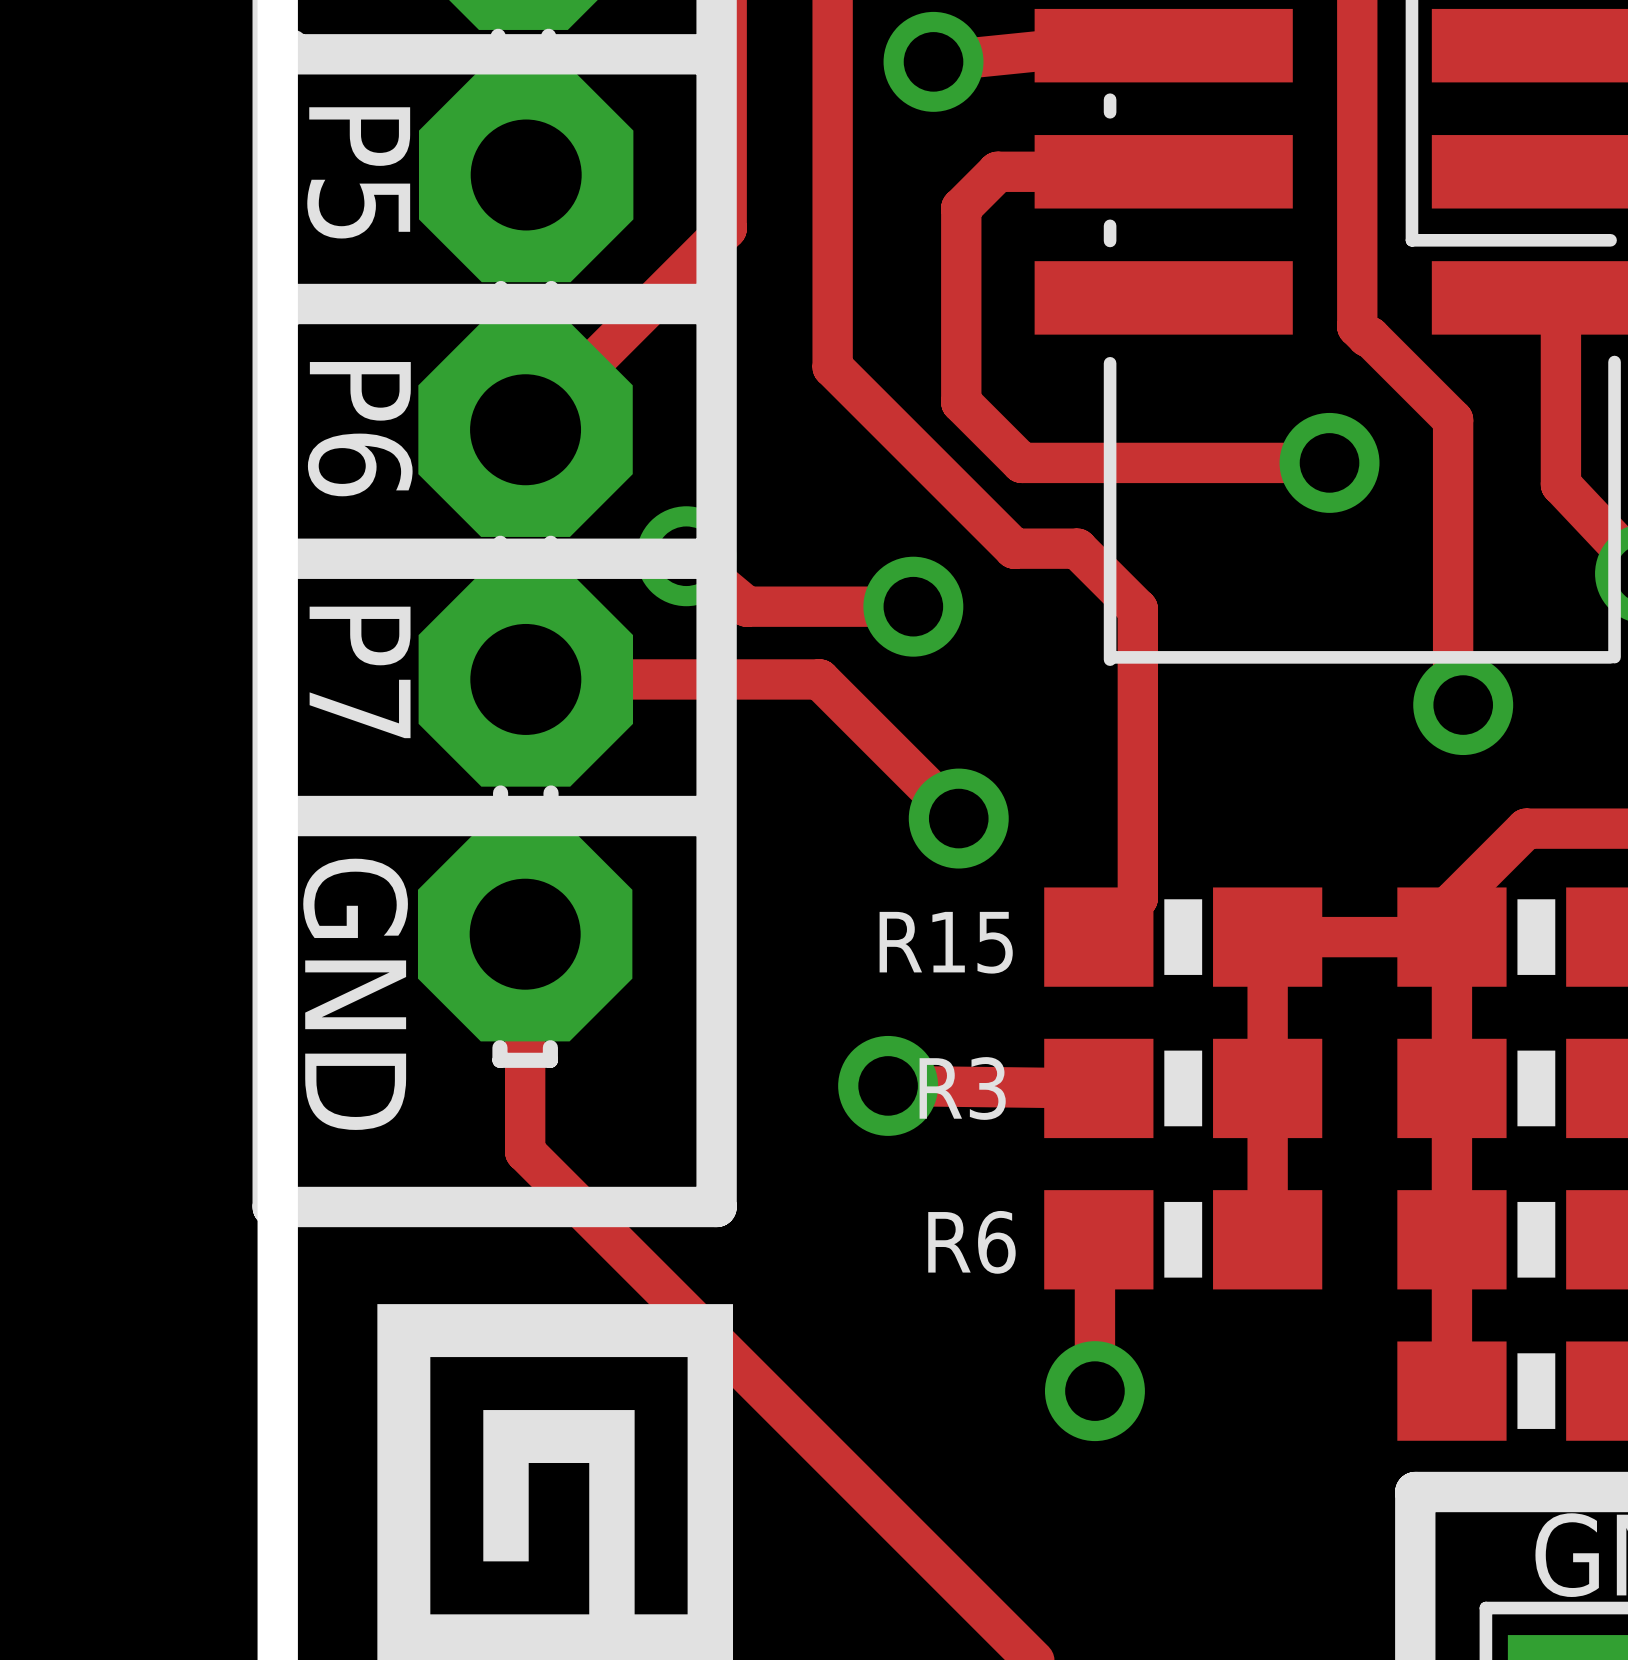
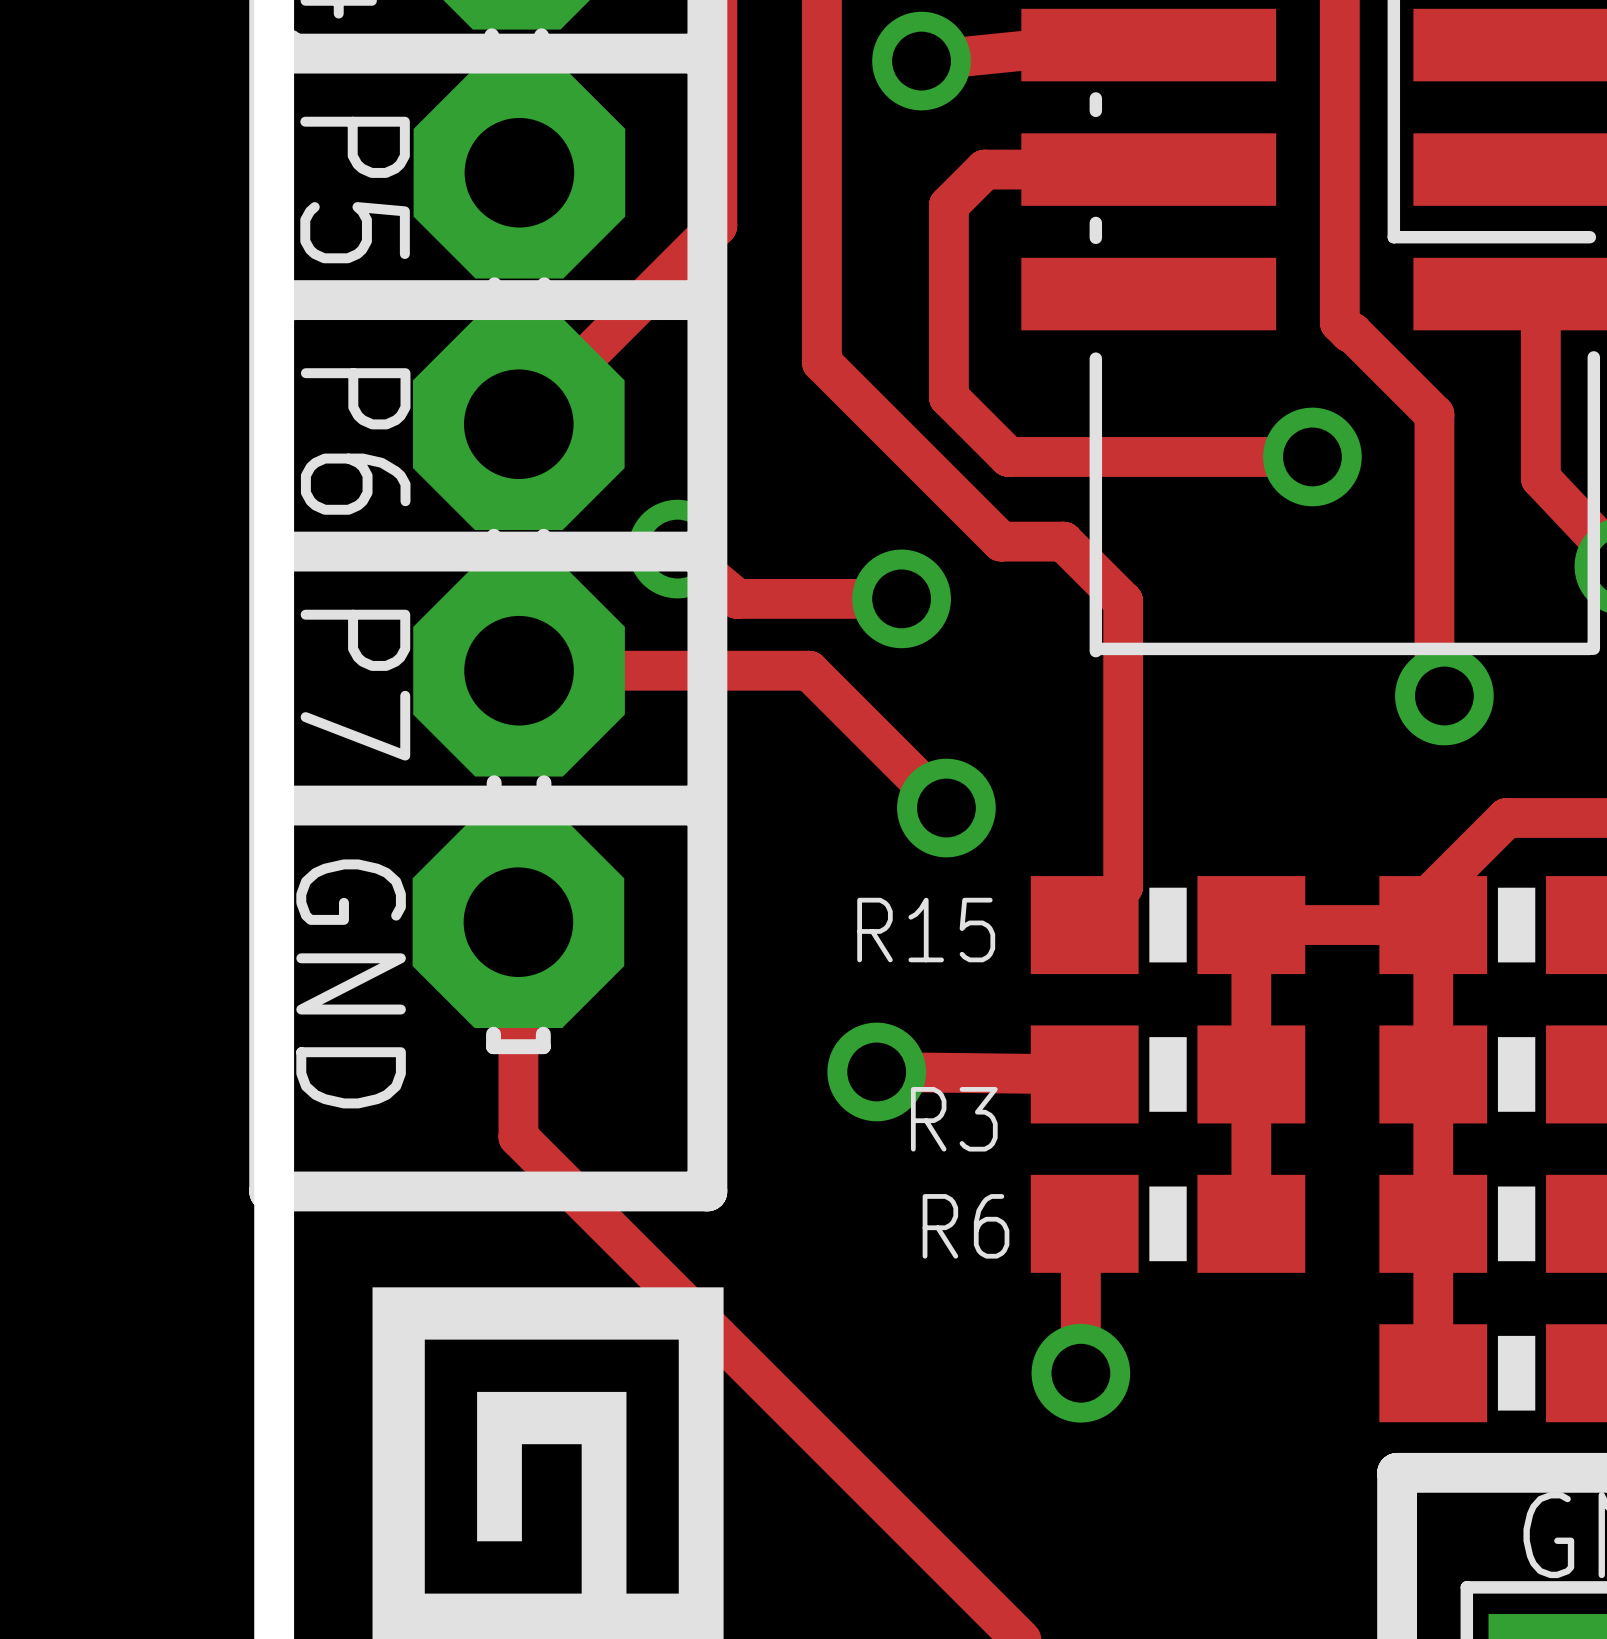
R3 name position: R3 (962, 1088) -> R3 (954, 1119)

